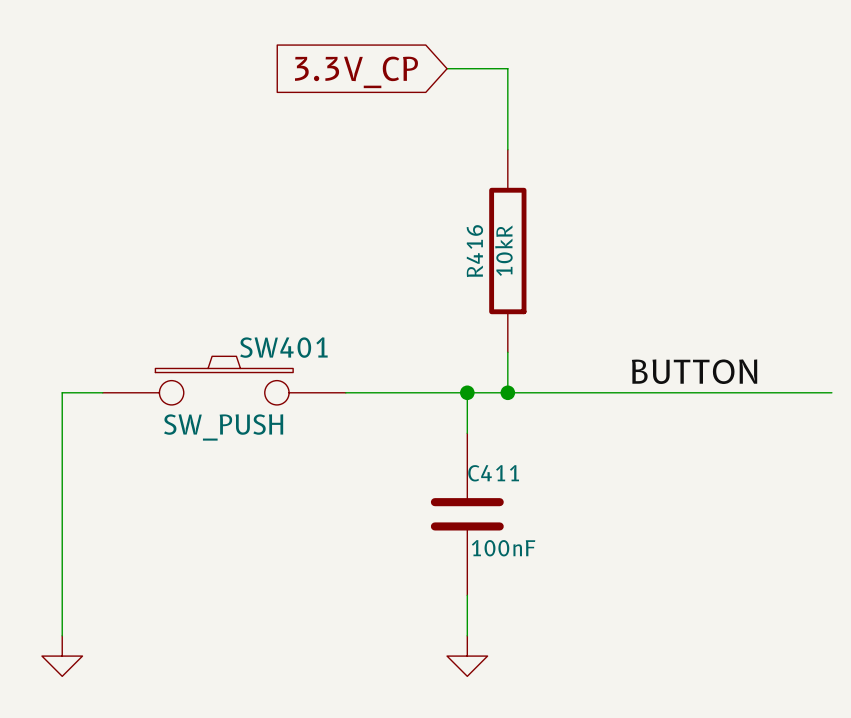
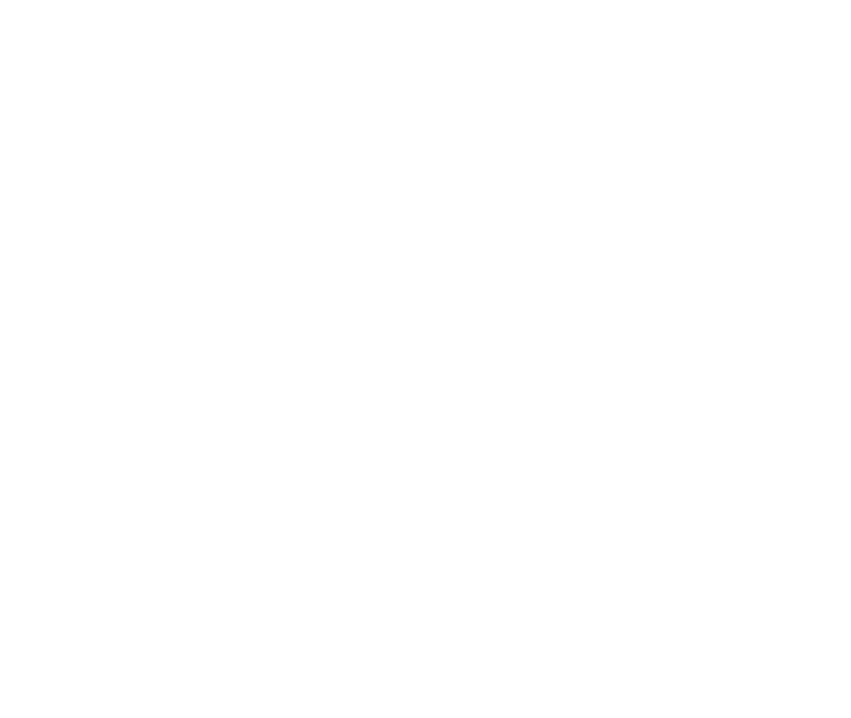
wire: (447, 68) (507, 68) (507, 149) -> none
global label: 3.3V_CP (356, 72) -> none
R416: 10kR (507, 251) -> none
wire: (507, 352) (507, 392) -> none
label: BUTTON (694, 371) -> none
SW401: SW_PUSH (224, 380) -> none
wire: (102, 392) (62, 392) (62, 635) -> none
wire: (345, 392) (831, 392) -> none
wire: (467, 392) (467, 433) -> none
junction: (467, 392) -> none
junction: (507, 392) -> none
C411: 100nF (467, 514) -> none
wire: (467, 595) (467, 635) -> none
power symbol: (62, 656) -> none
power symbol: (467, 656) -> none

